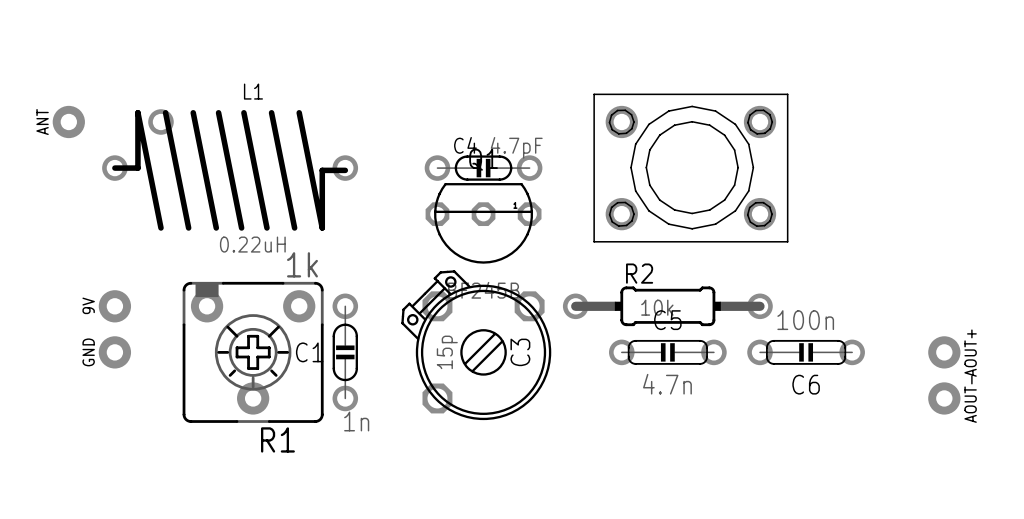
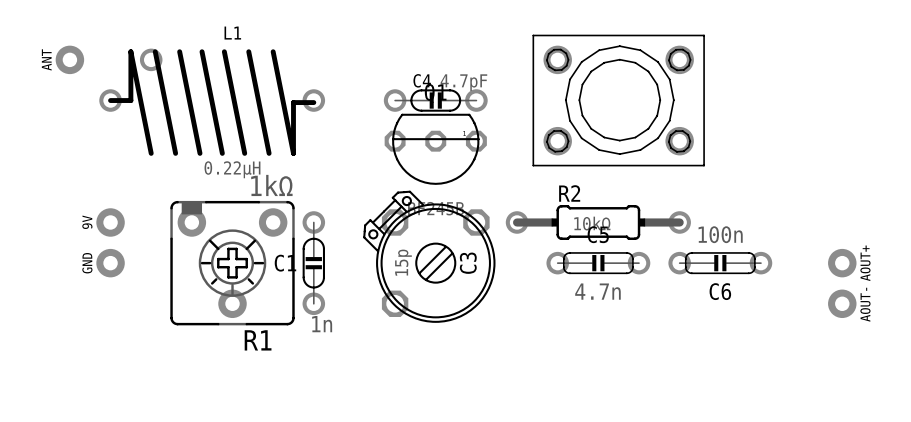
L1 value: 0.22uH (252, 244) -> 0.22μH (232, 169)
R1 value: 1k (302, 264) -> 1kΩ (271, 185)
R2 value: 10k (657, 307) -> 10kΩ (592, 223)

